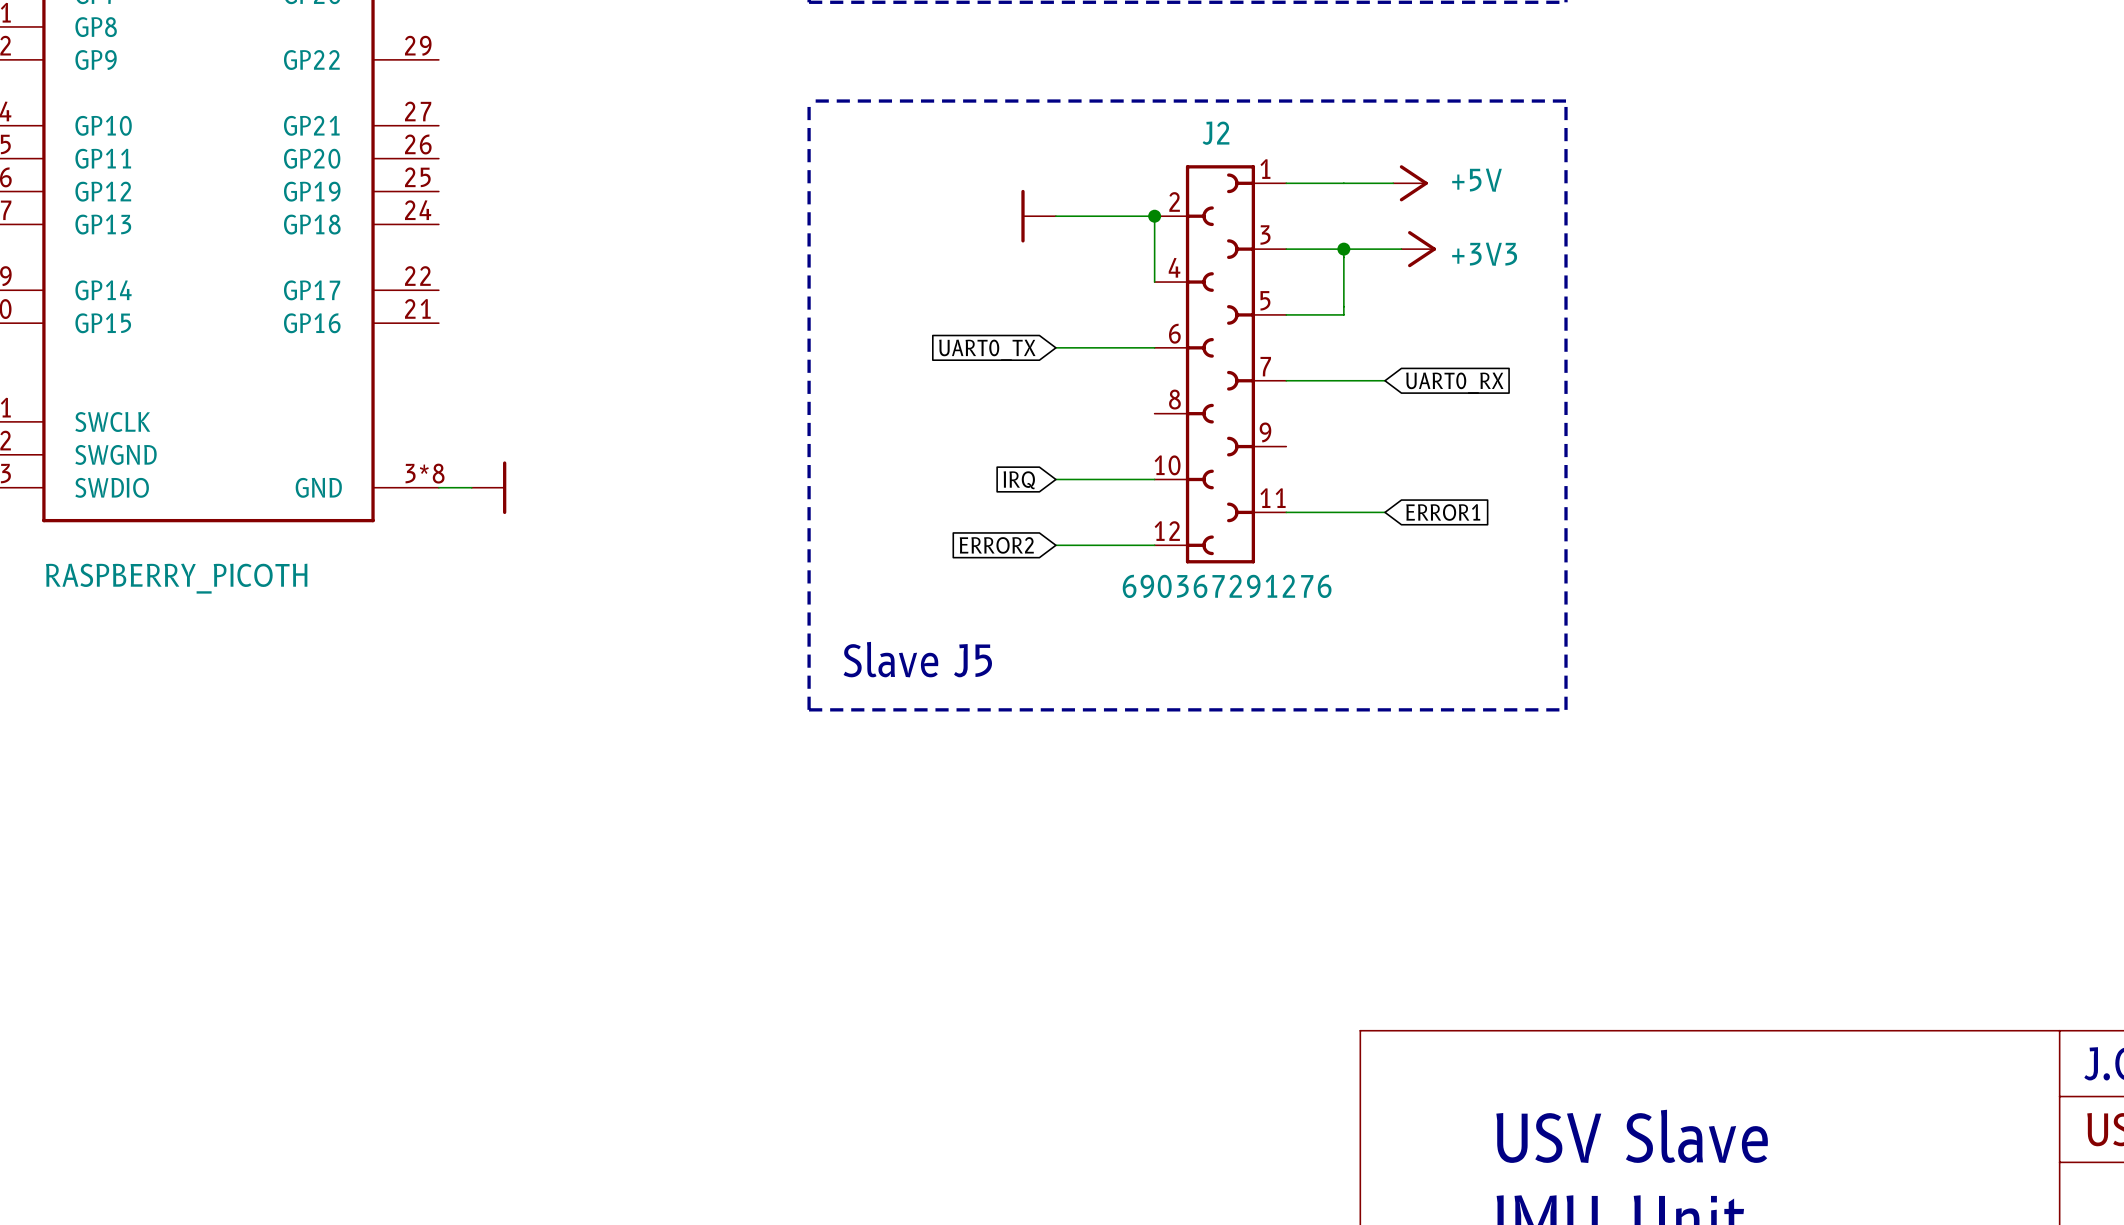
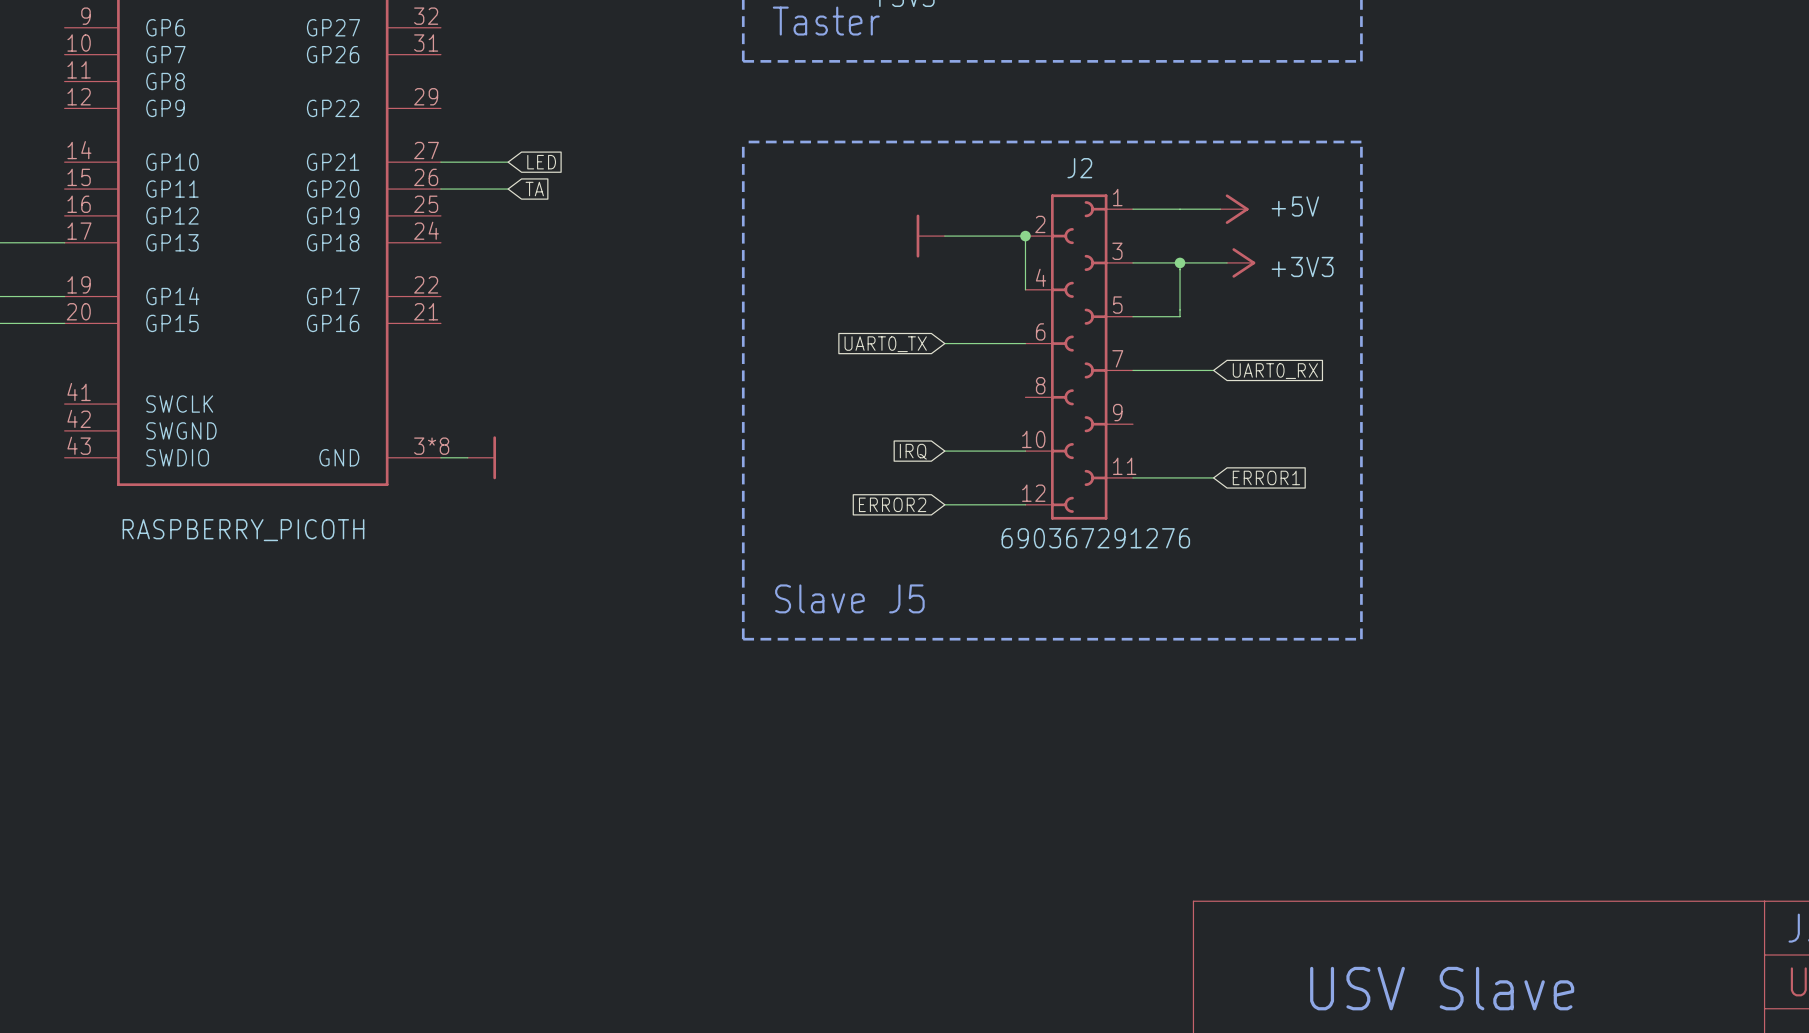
wire: none -> (440, 162) (508, 162)
global label: none -> LED (541, 162)
wire: none -> (440, 189) (508, 189)
global label: none -> TA (534, 189)

